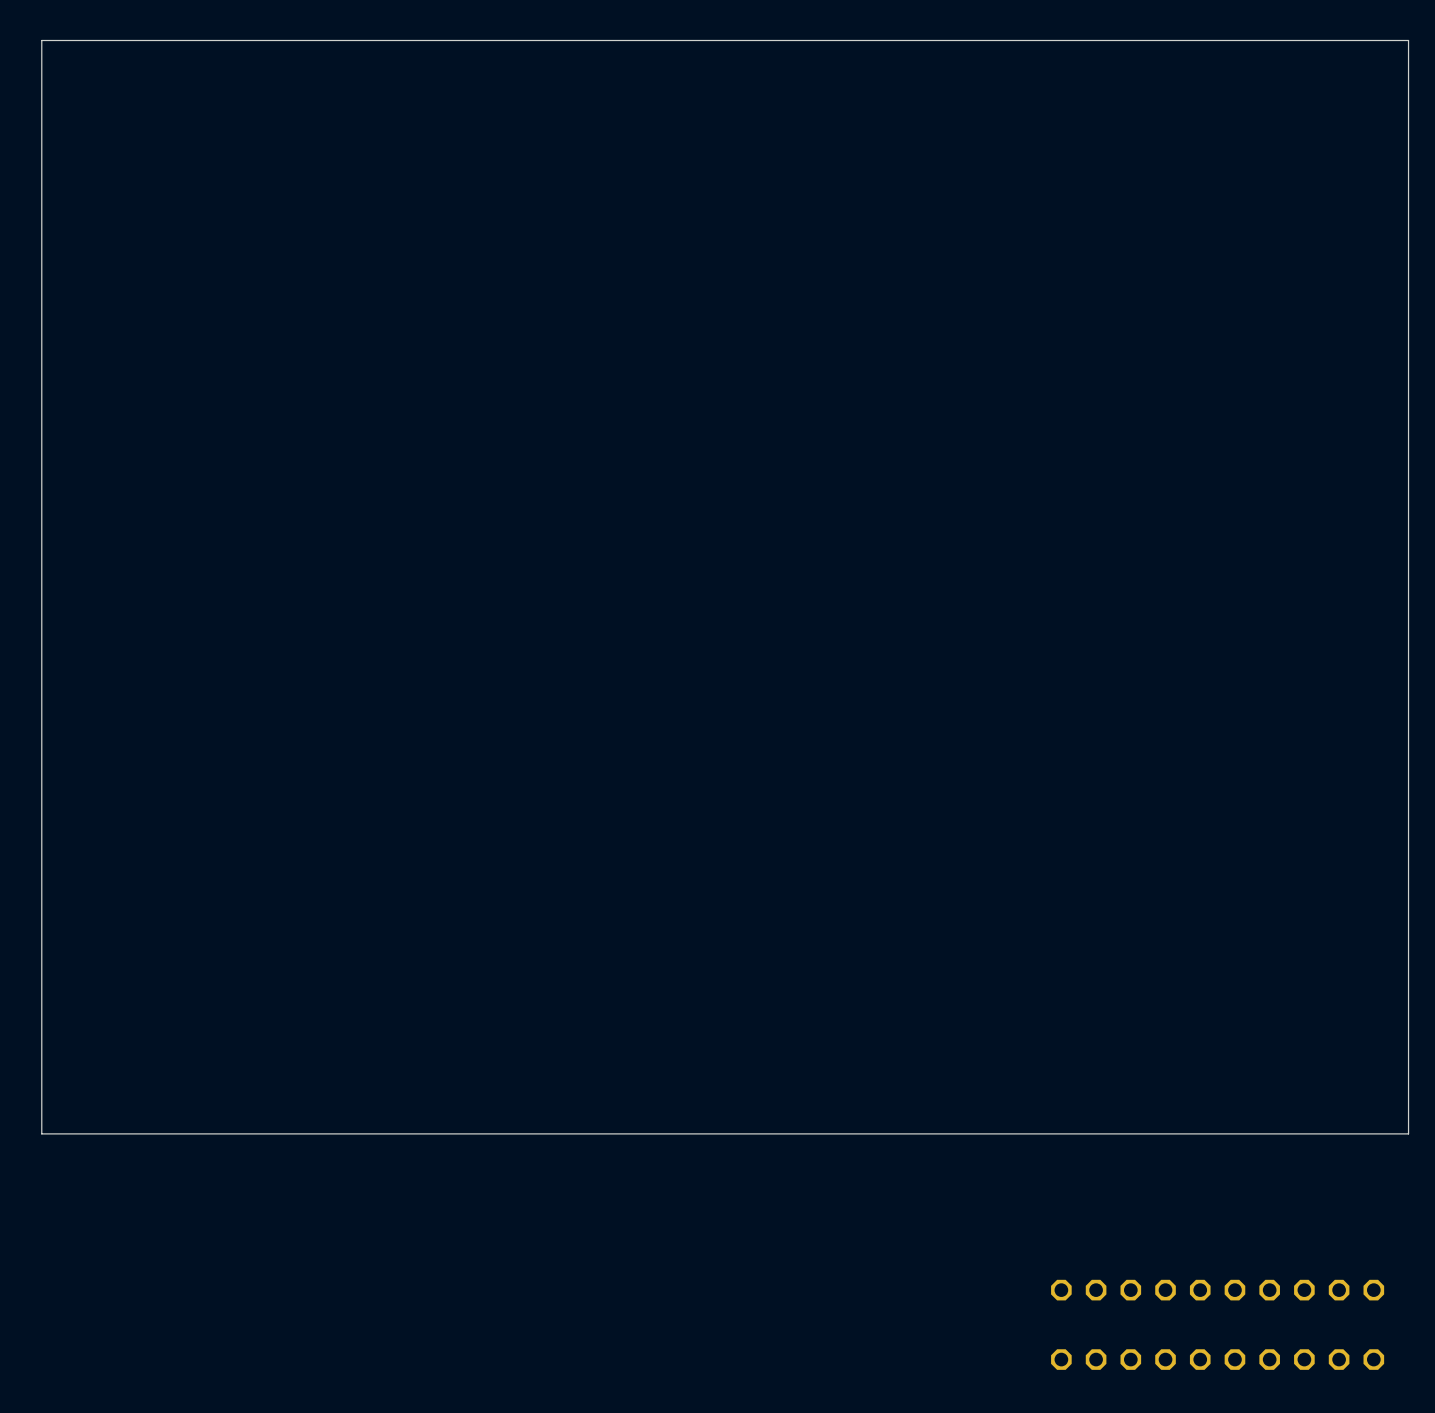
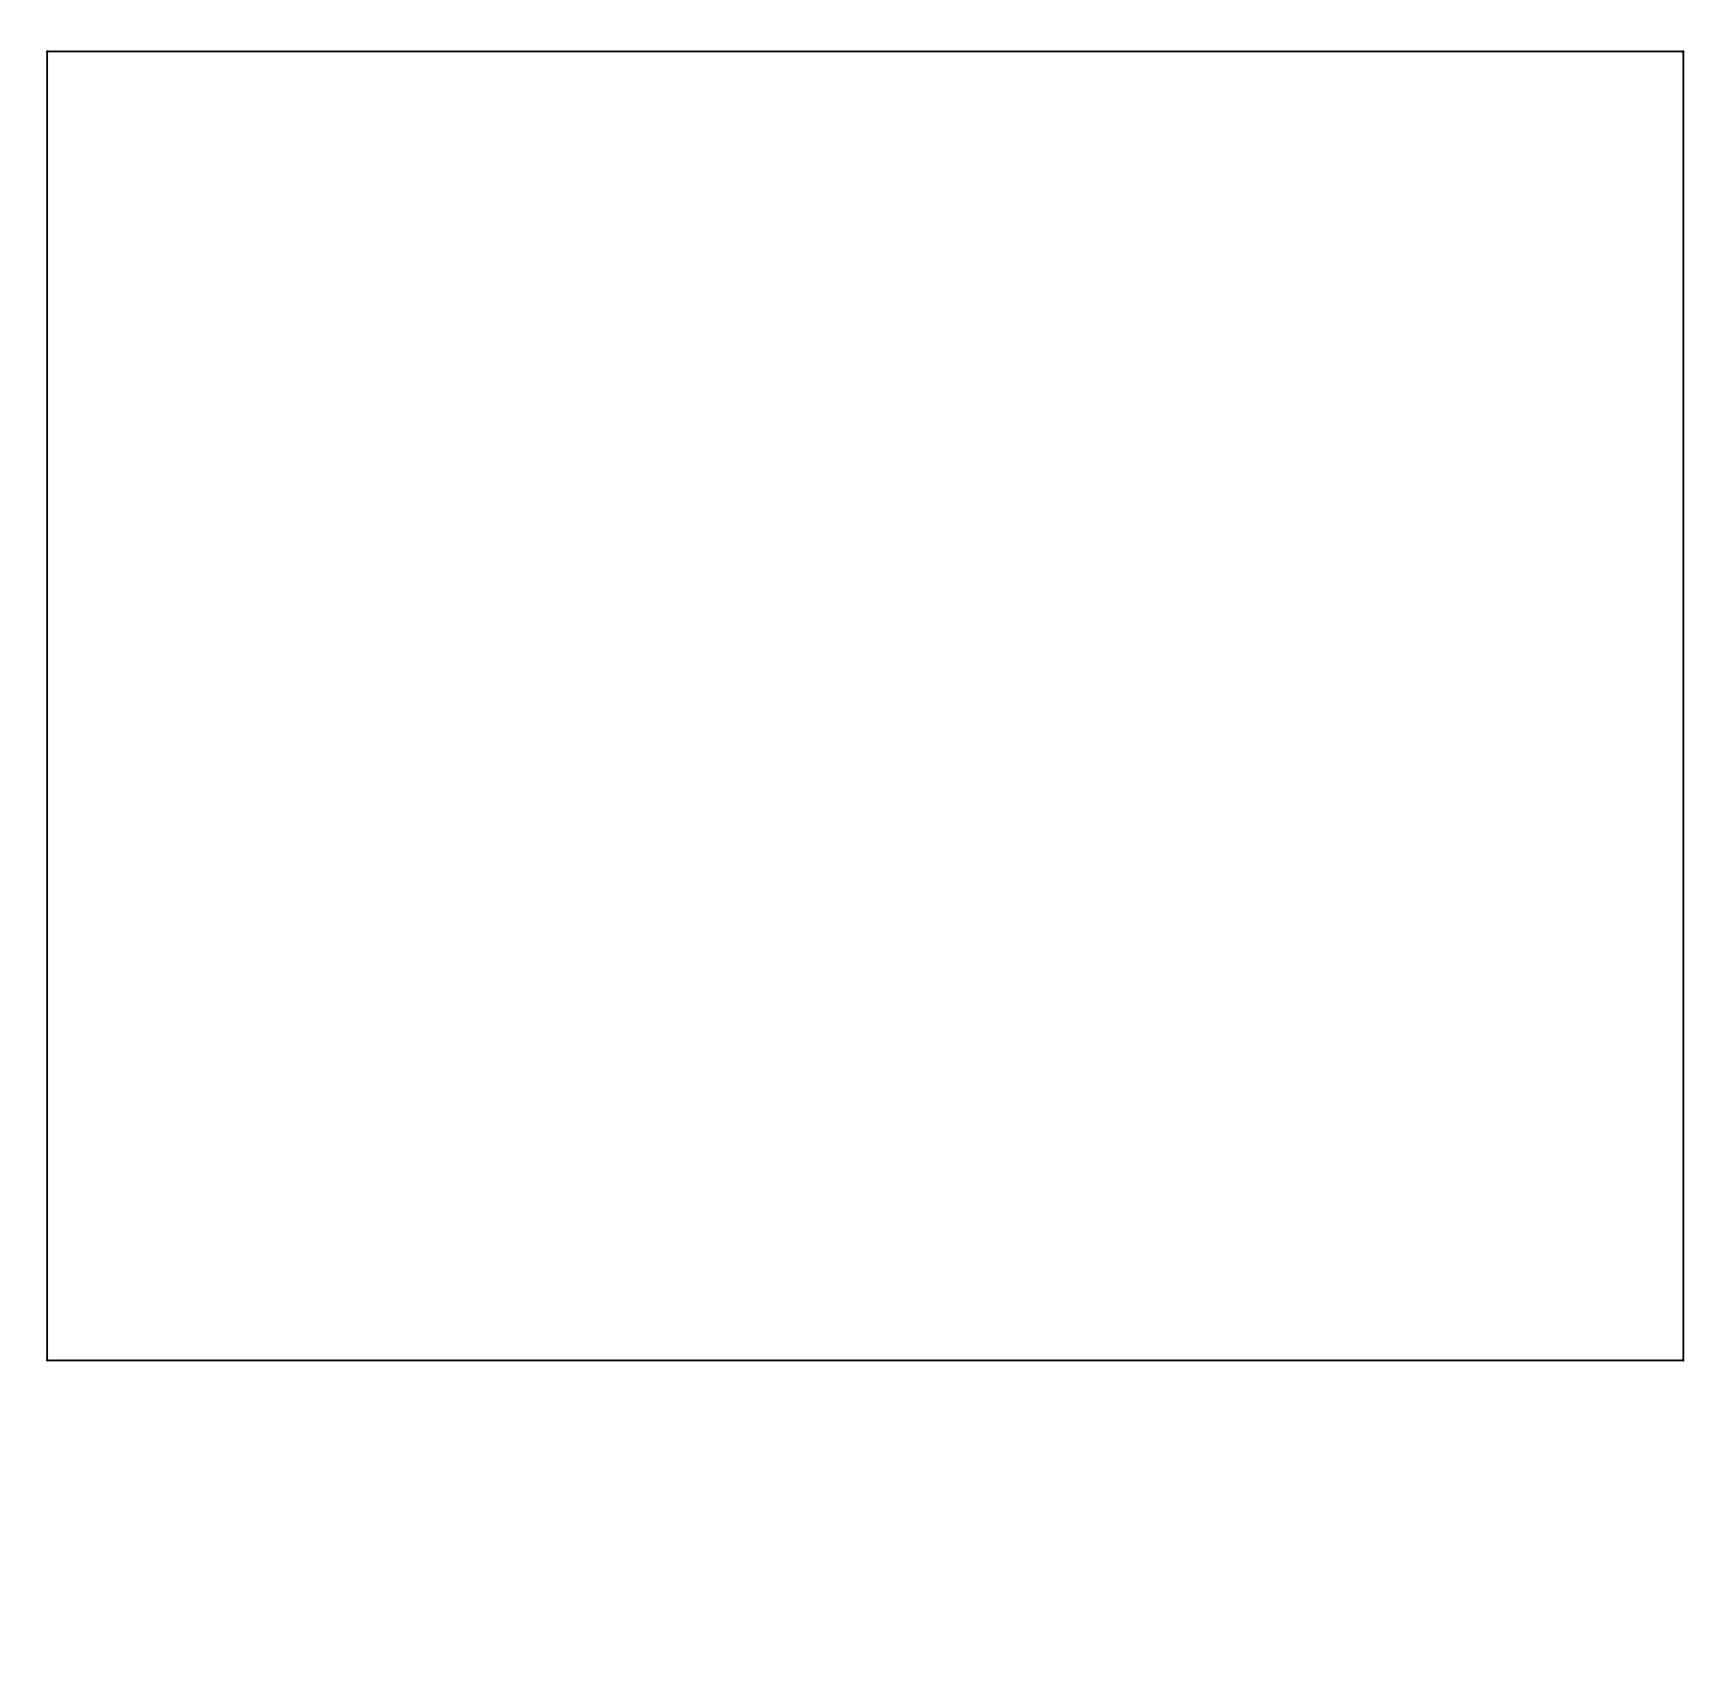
part: (1217, 1290) -> none
part: (1217, 1359) -> none

